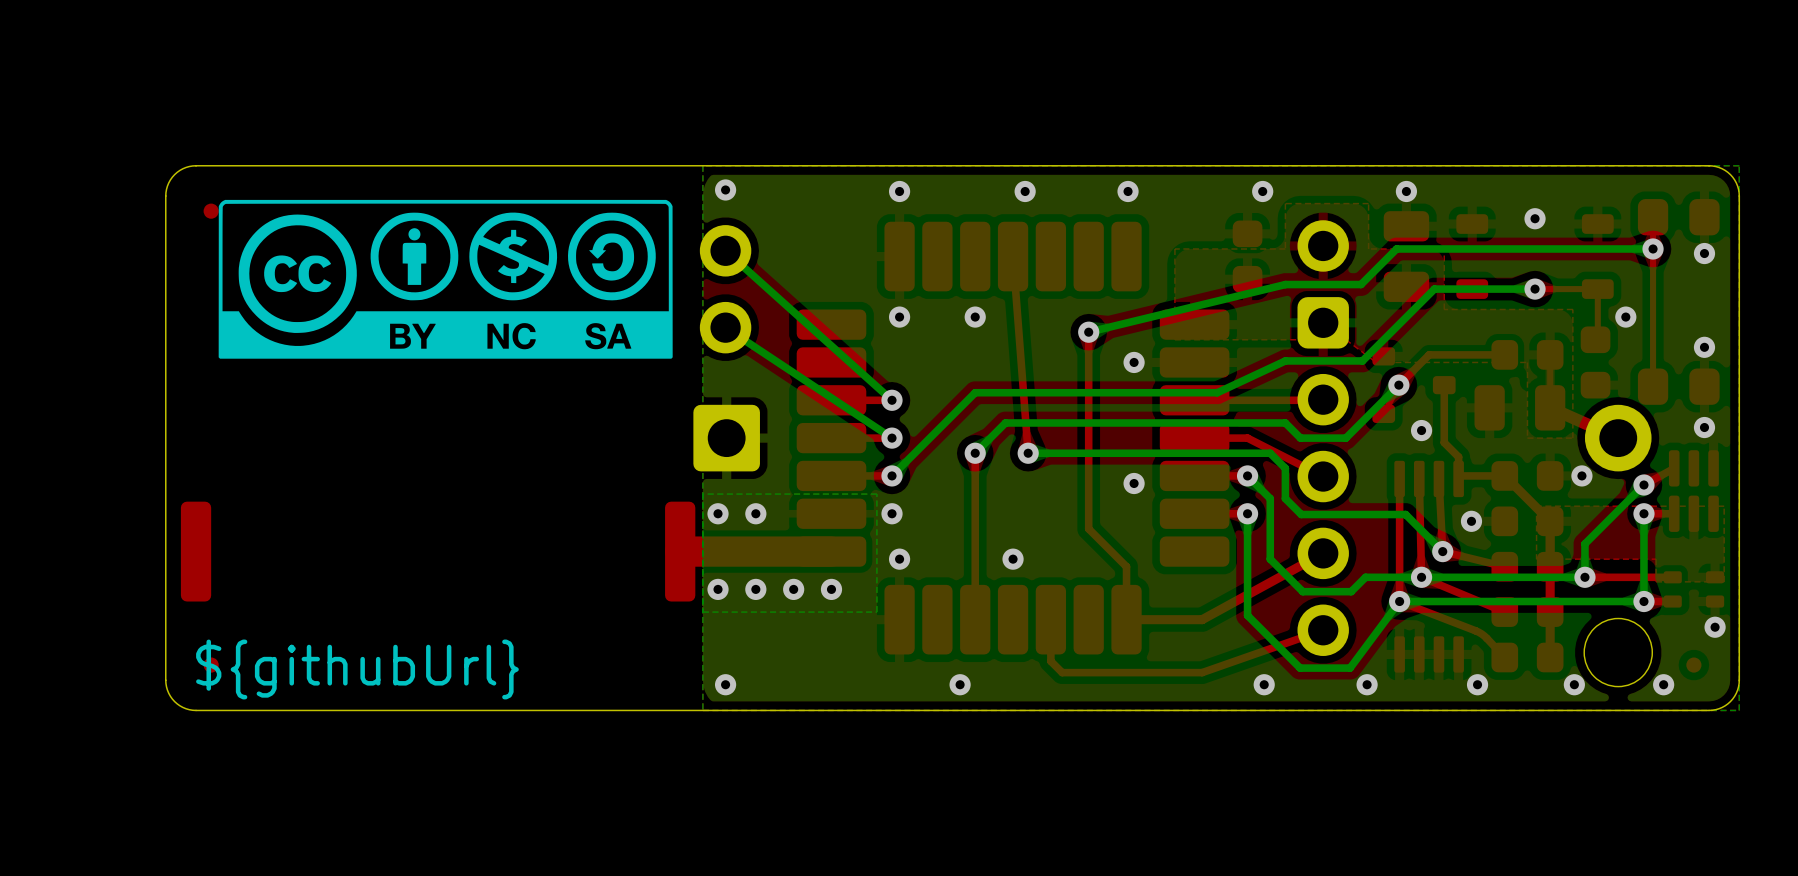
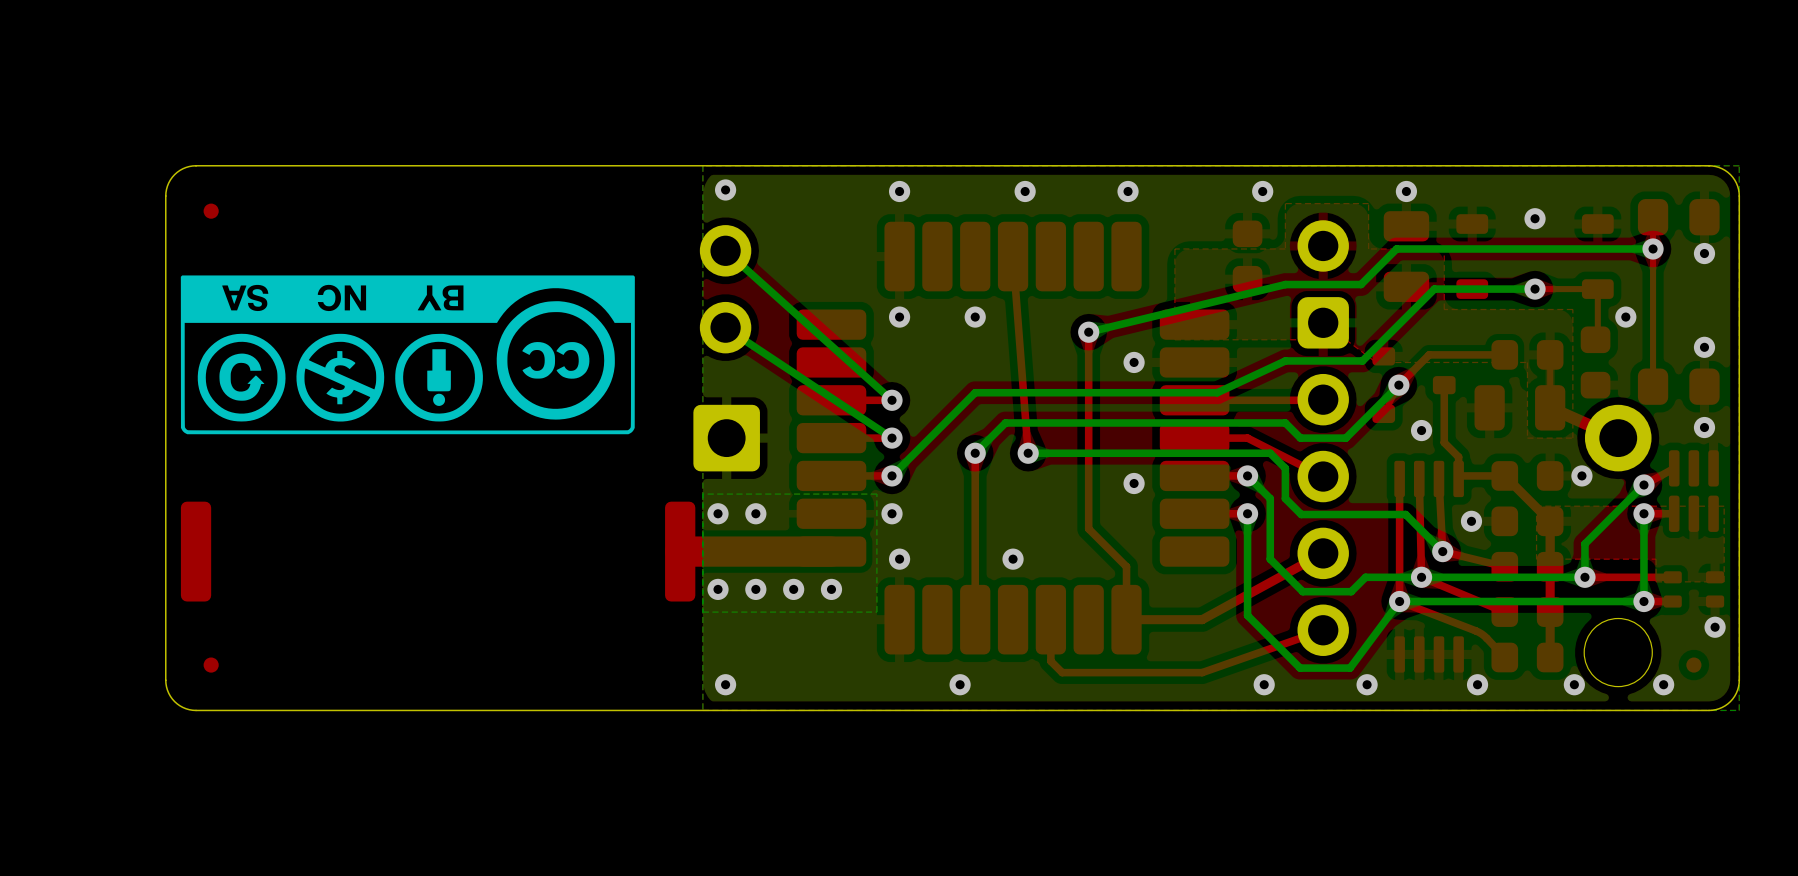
drawing: [218, 199, 673, 359] -> none
drawing: none -> [180, 275, 635, 435]
text: ${githubUrl} (357, 669) -> none

